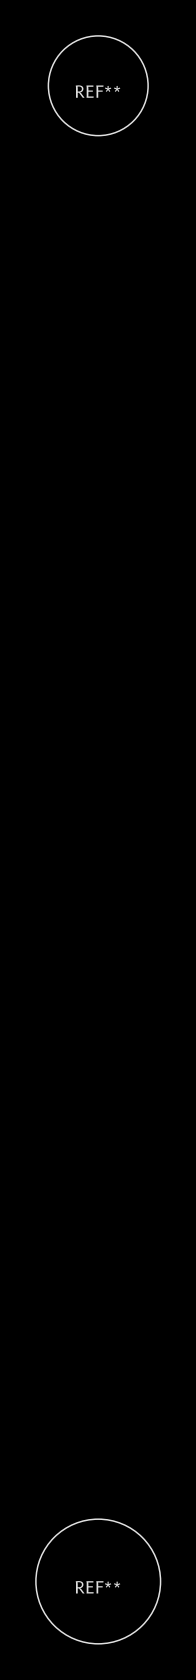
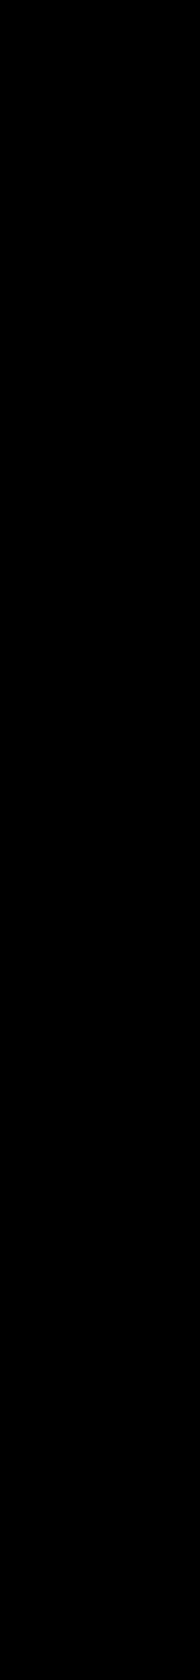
REF**: (98, 85) -> none
REF**: (98, 1581) -> none

